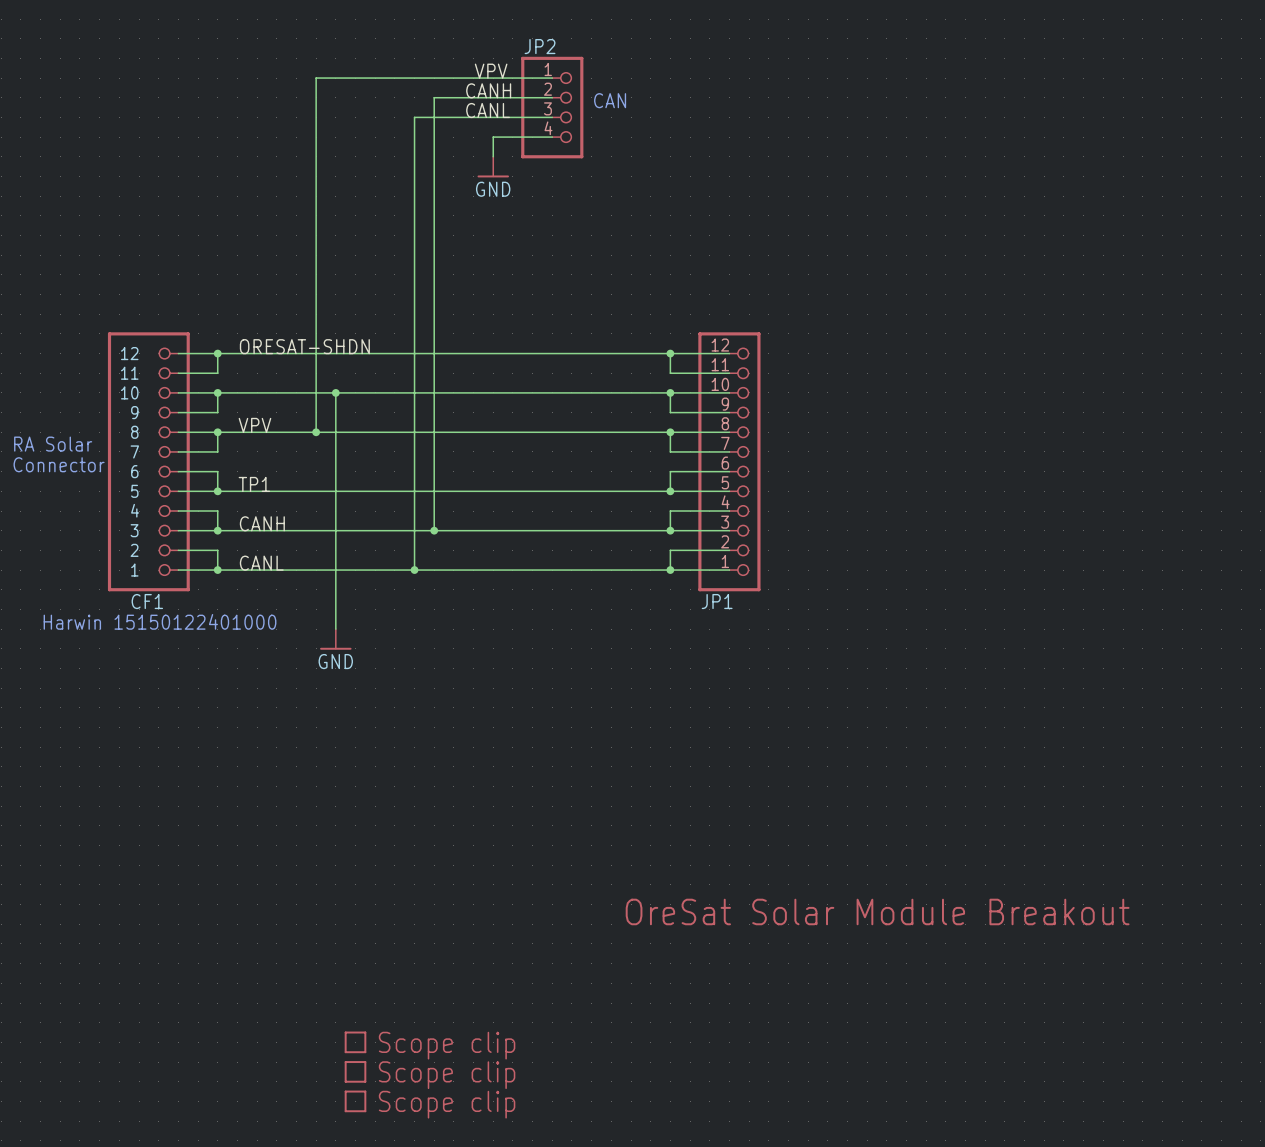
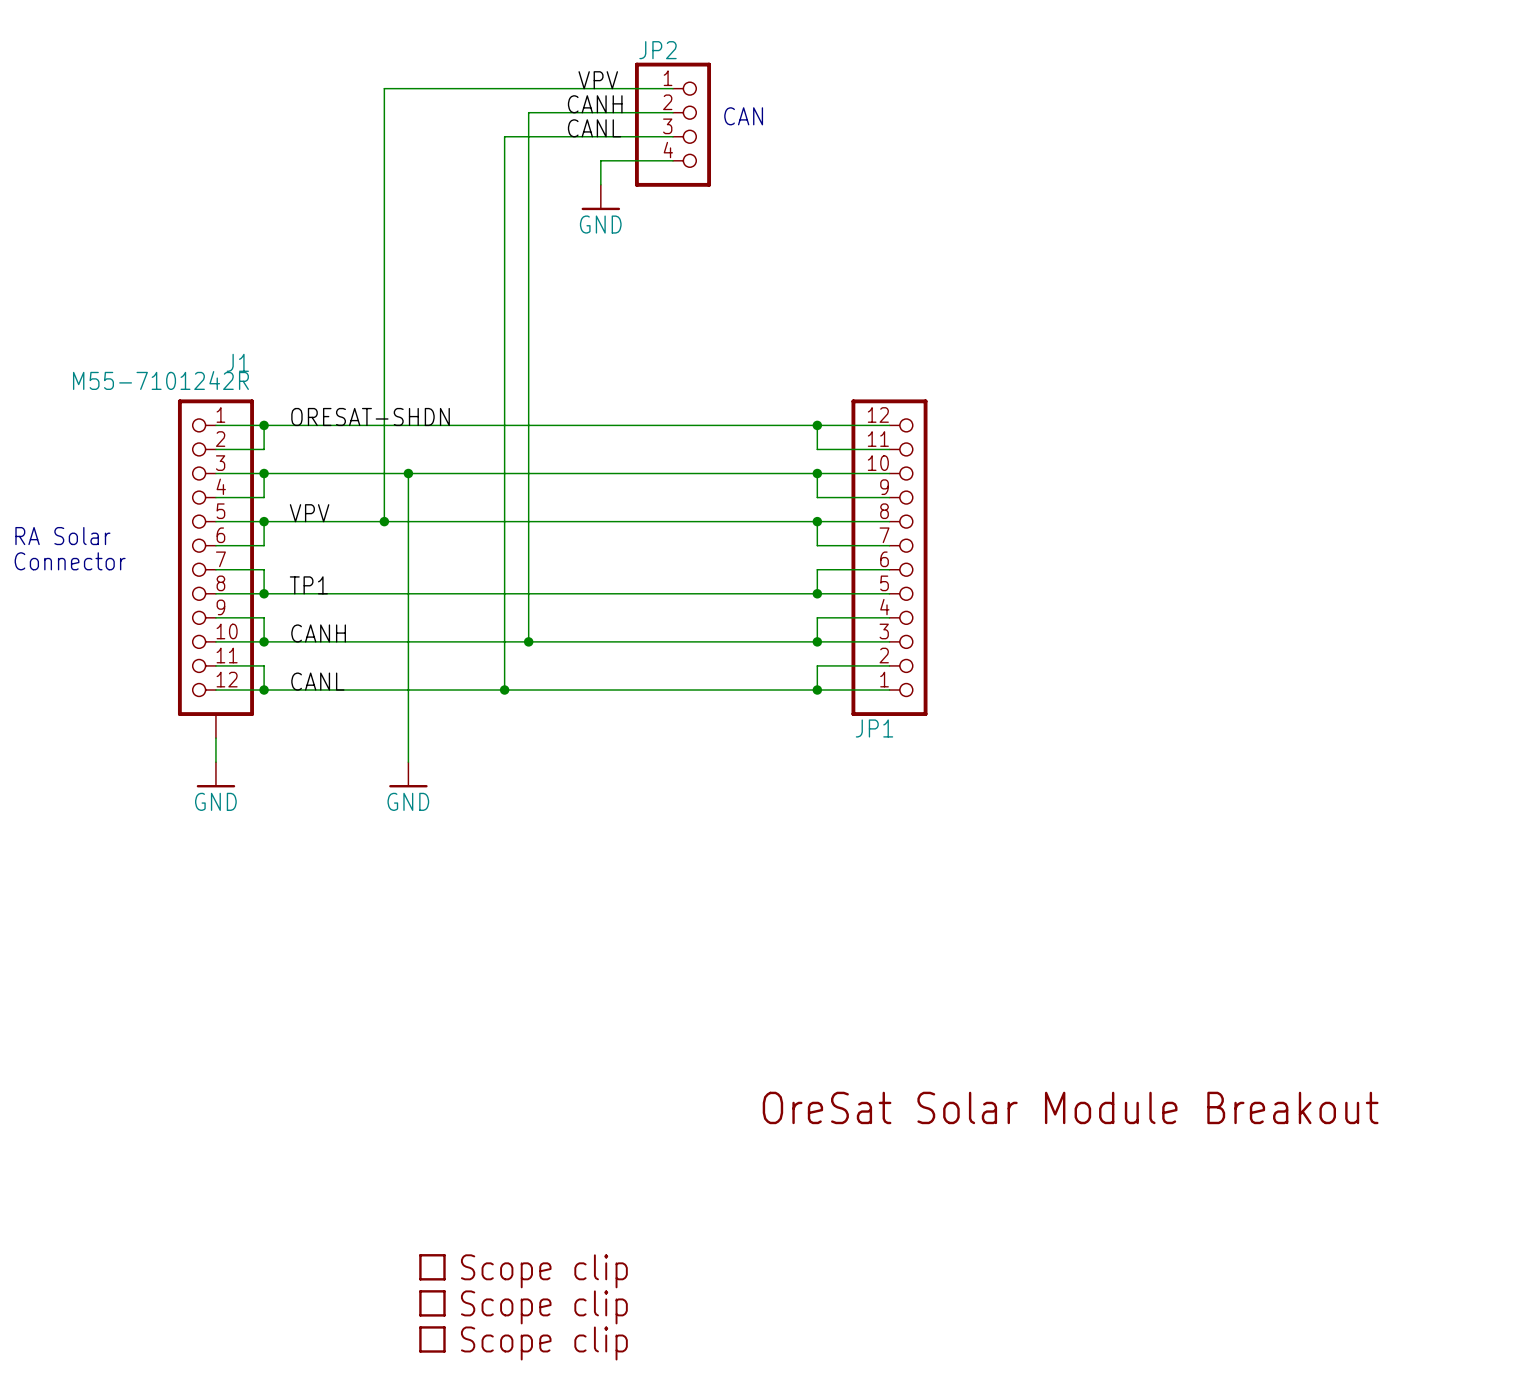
CF1: (148, 461) -> none
J1: none -> M55-7101242R (215, 568)
wire: none -> (215, 738) (215, 762)
text: Harwin 15150122401000 (160, 621) -> none
power symbol: none -> GND (215, 774)

